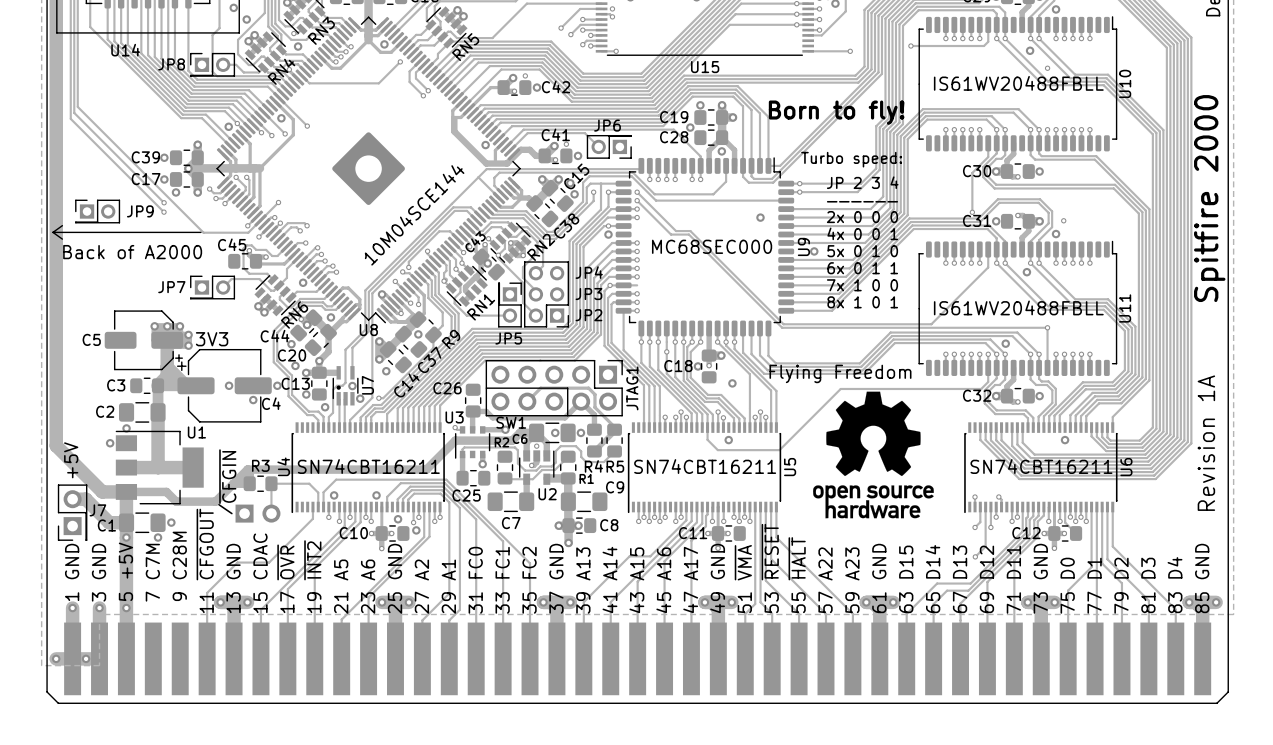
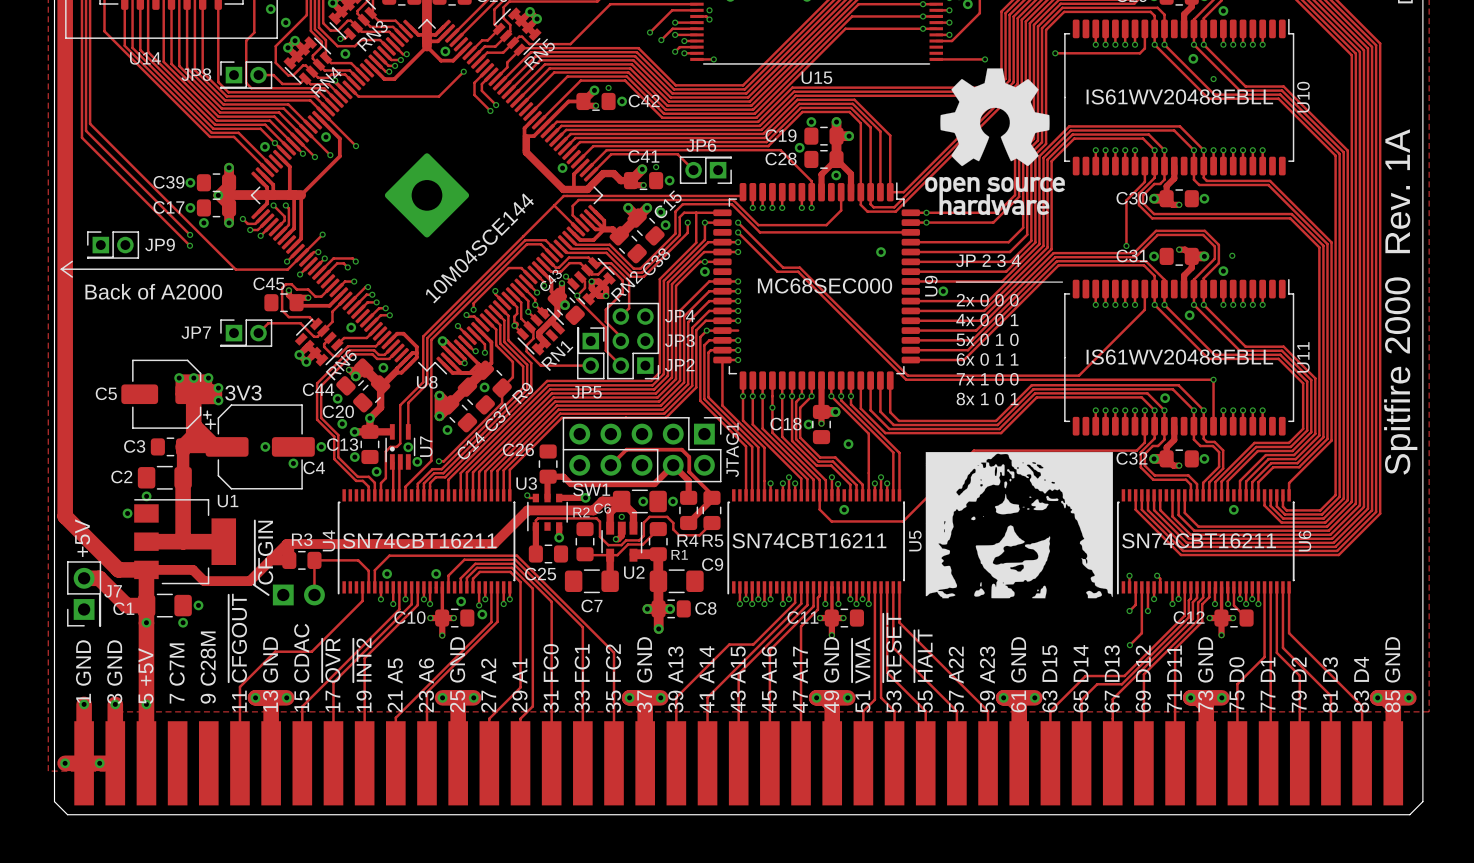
drawing: none -> [925, 68, 1065, 216]
text: Born to fly! (836, 112) -> none
text: Turbo speed: (851, 159) -> none
text position: JP 2 3 4 (862, 182) -> JP 2 3 4 (988, 260)
text: Spitfire 2000 (1209, 198) -> Spitfire 2000 Rev. 1A (1400, 301)
text position: —————— (862, 201) -> —————— (1009, 282)
text position: 2x 0 0 0 (862, 217) -> 2x 0 0 0 (987, 300)
text position: 4x 0 0 1 (862, 233) -> 4x 0 0 1 (987, 319)
text position: 5x 0 1 0 (862, 251) -> 5x 0 1 0 (987, 339)
text position: 6x 0 1 1 (862, 268) -> 6x 0 1 1 (987, 359)
text position: 7x 1 0 0 (862, 285) -> 7x 1 0 0 (987, 379)
text position: 8x 1 0 1 (862, 302) -> 8x 1 0 1 (987, 399)
text: Flying Freedom (840, 373) -> none
drawing shape: [813, 391, 934, 519] -> [925, 452, 1113, 599]
text: Revision 1A (1206, 443) -> none

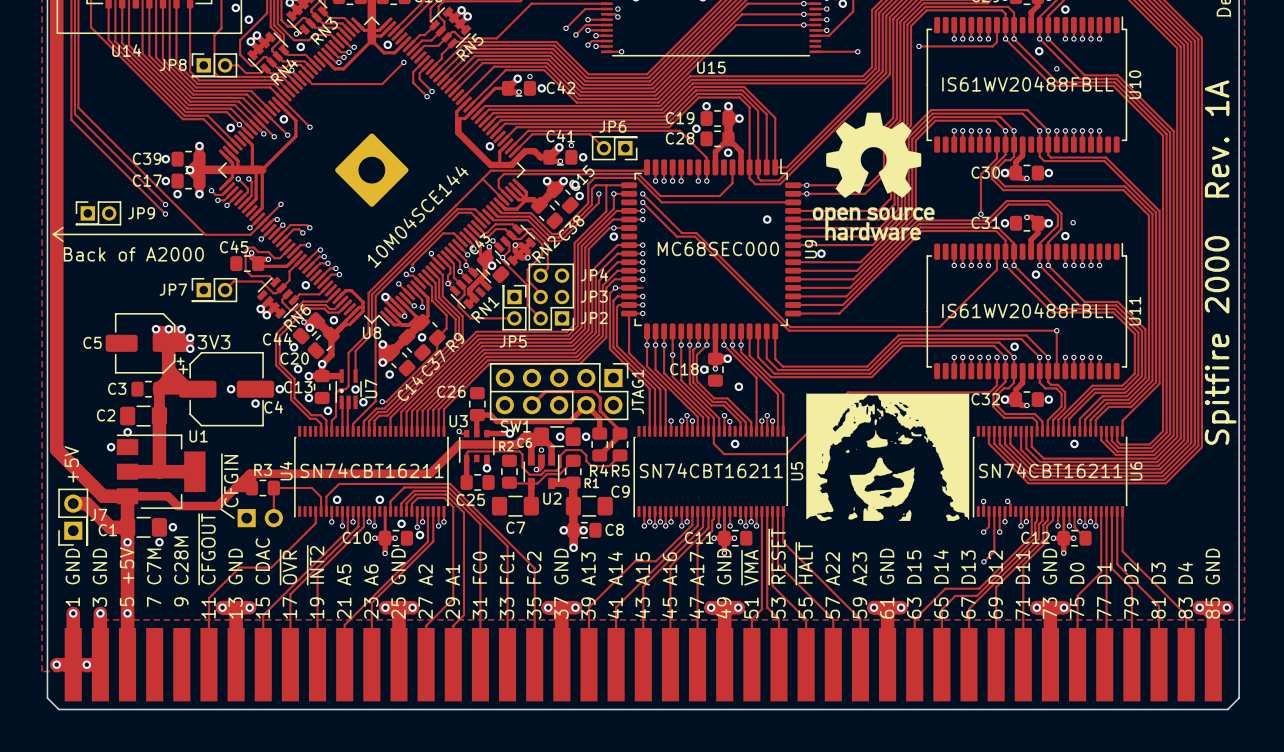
drawing position: (995, 141) -> (873, 176)
text: JP 2 3 4 (988, 260) -> none
text: —————— (1009, 282) -> none
text: 2x 0 0 0 (987, 300) -> none
text: 4x 0 0 1 (987, 319) -> none
text: 5x 0 1 0 (987, 339) -> none
text: 6x 0 1 1 (987, 359) -> none
text: 7x 1 0 0 (987, 379) -> none
text: 8x 1 0 1 (987, 399) -> none

